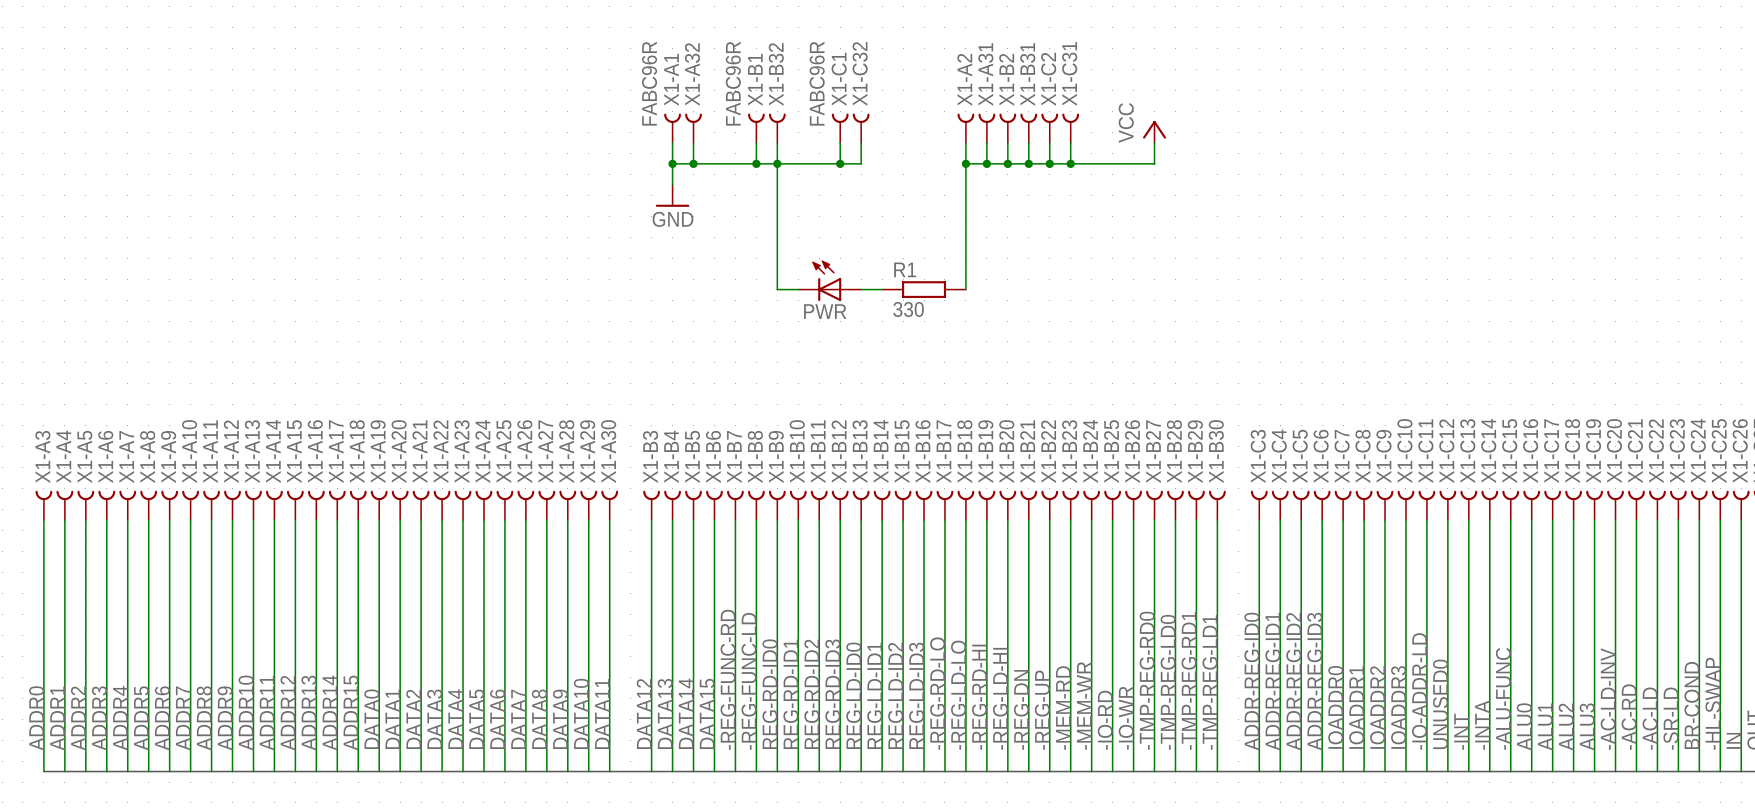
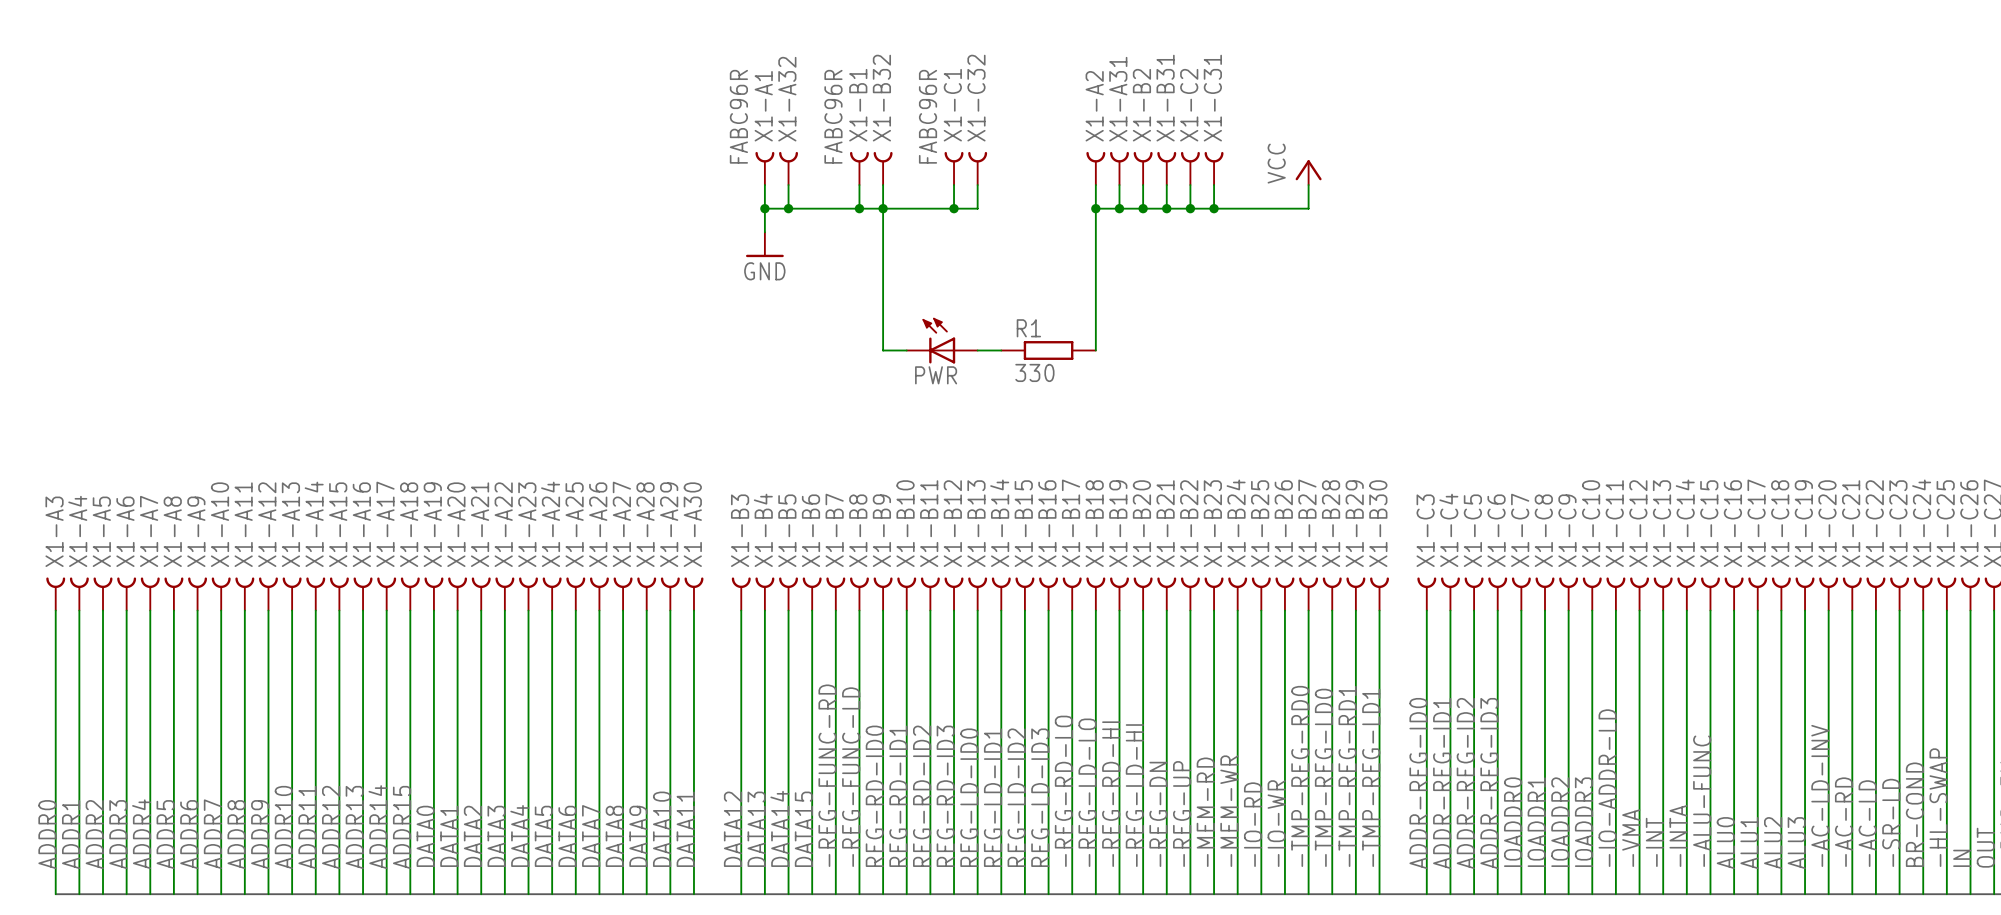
label: UNUSED0 (1440, 704) -> -VMA (1631, 838)

